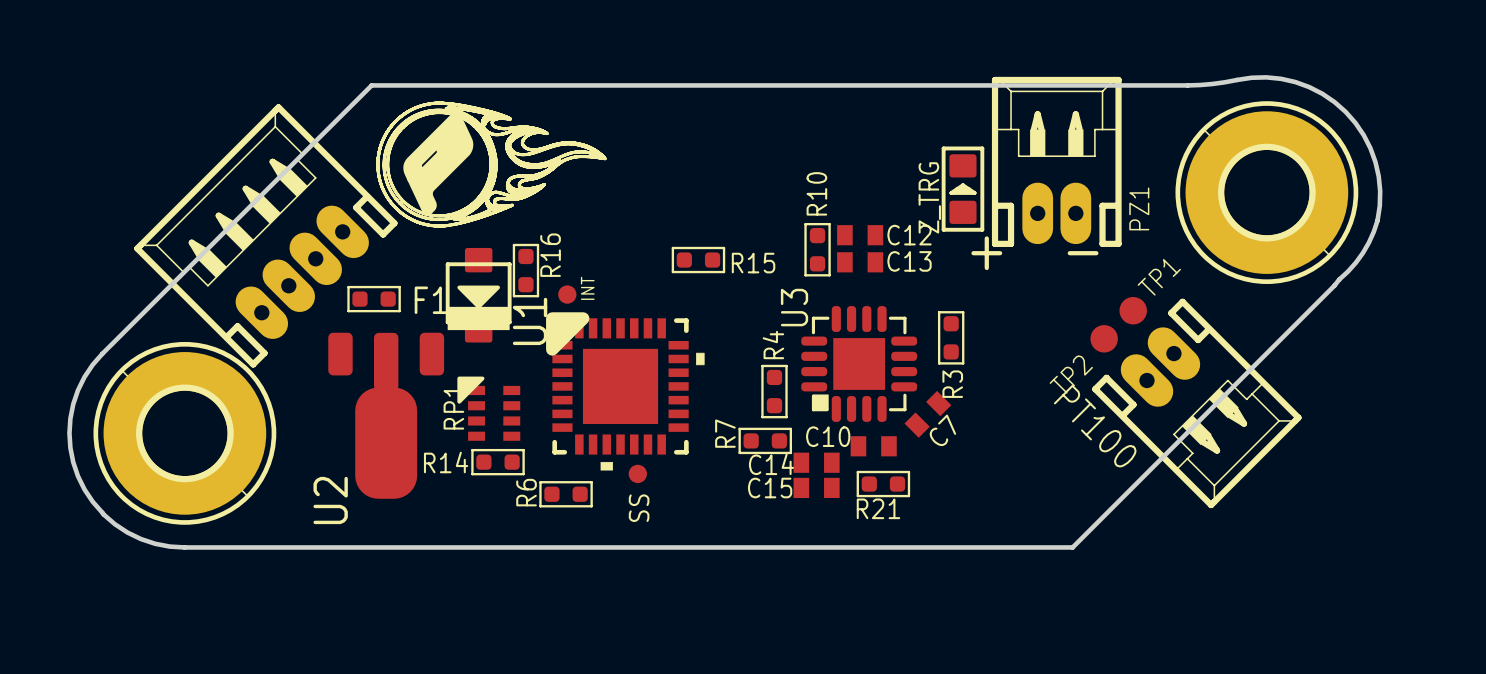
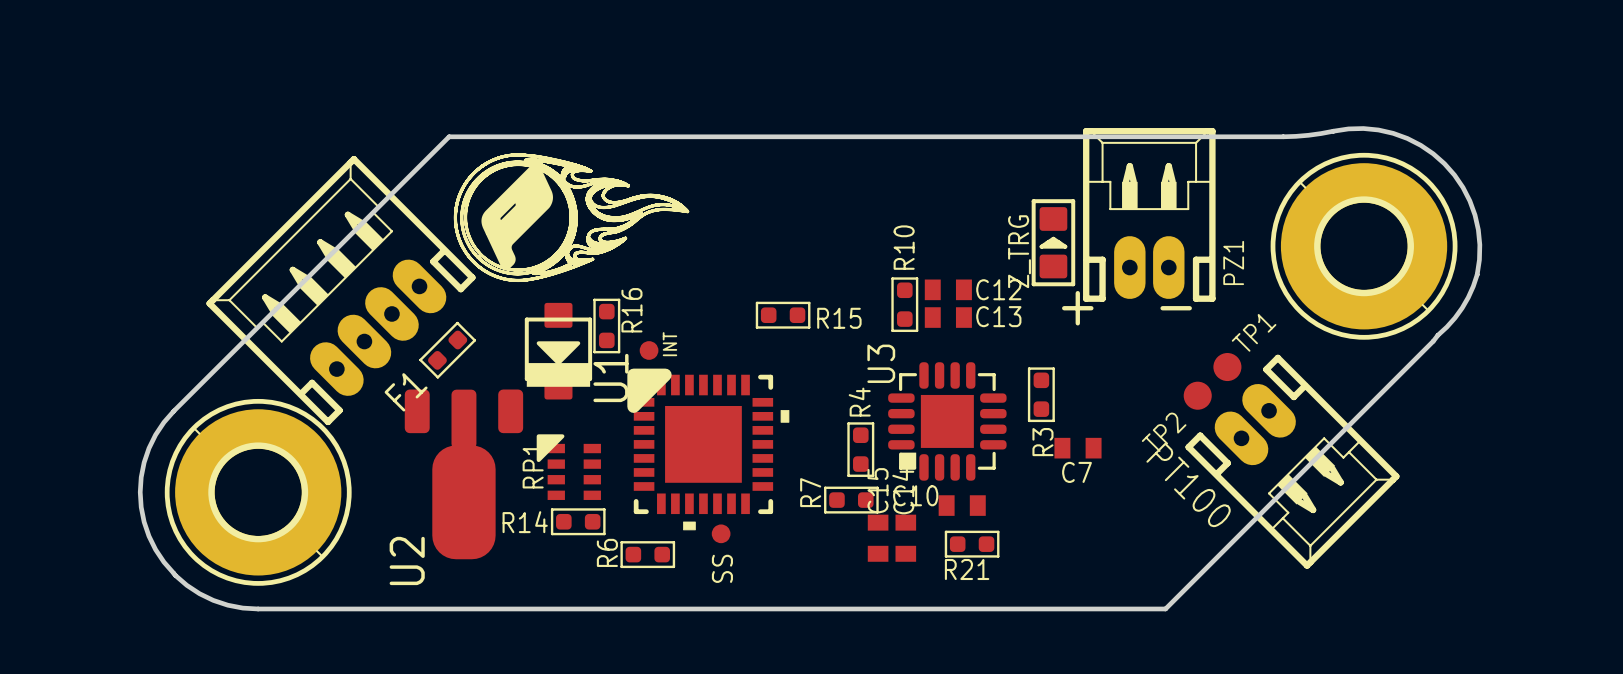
F1 rotation: 0° (374, 299) -> 45° counterclockwise (447, 350)
F1 name position: F1 (431, 300) -> F1 (406, 392)
C7 rotation: 0° (927, 414) -> 45° clockwise (1077, 448)
C7 position: (927, 414) -> (1077, 448)
C14 rotation: 0° (816, 462) -> 90° clockwise (905, 538)
C15 rotation: 0° (816, 487) -> 90° clockwise (878, 538)

